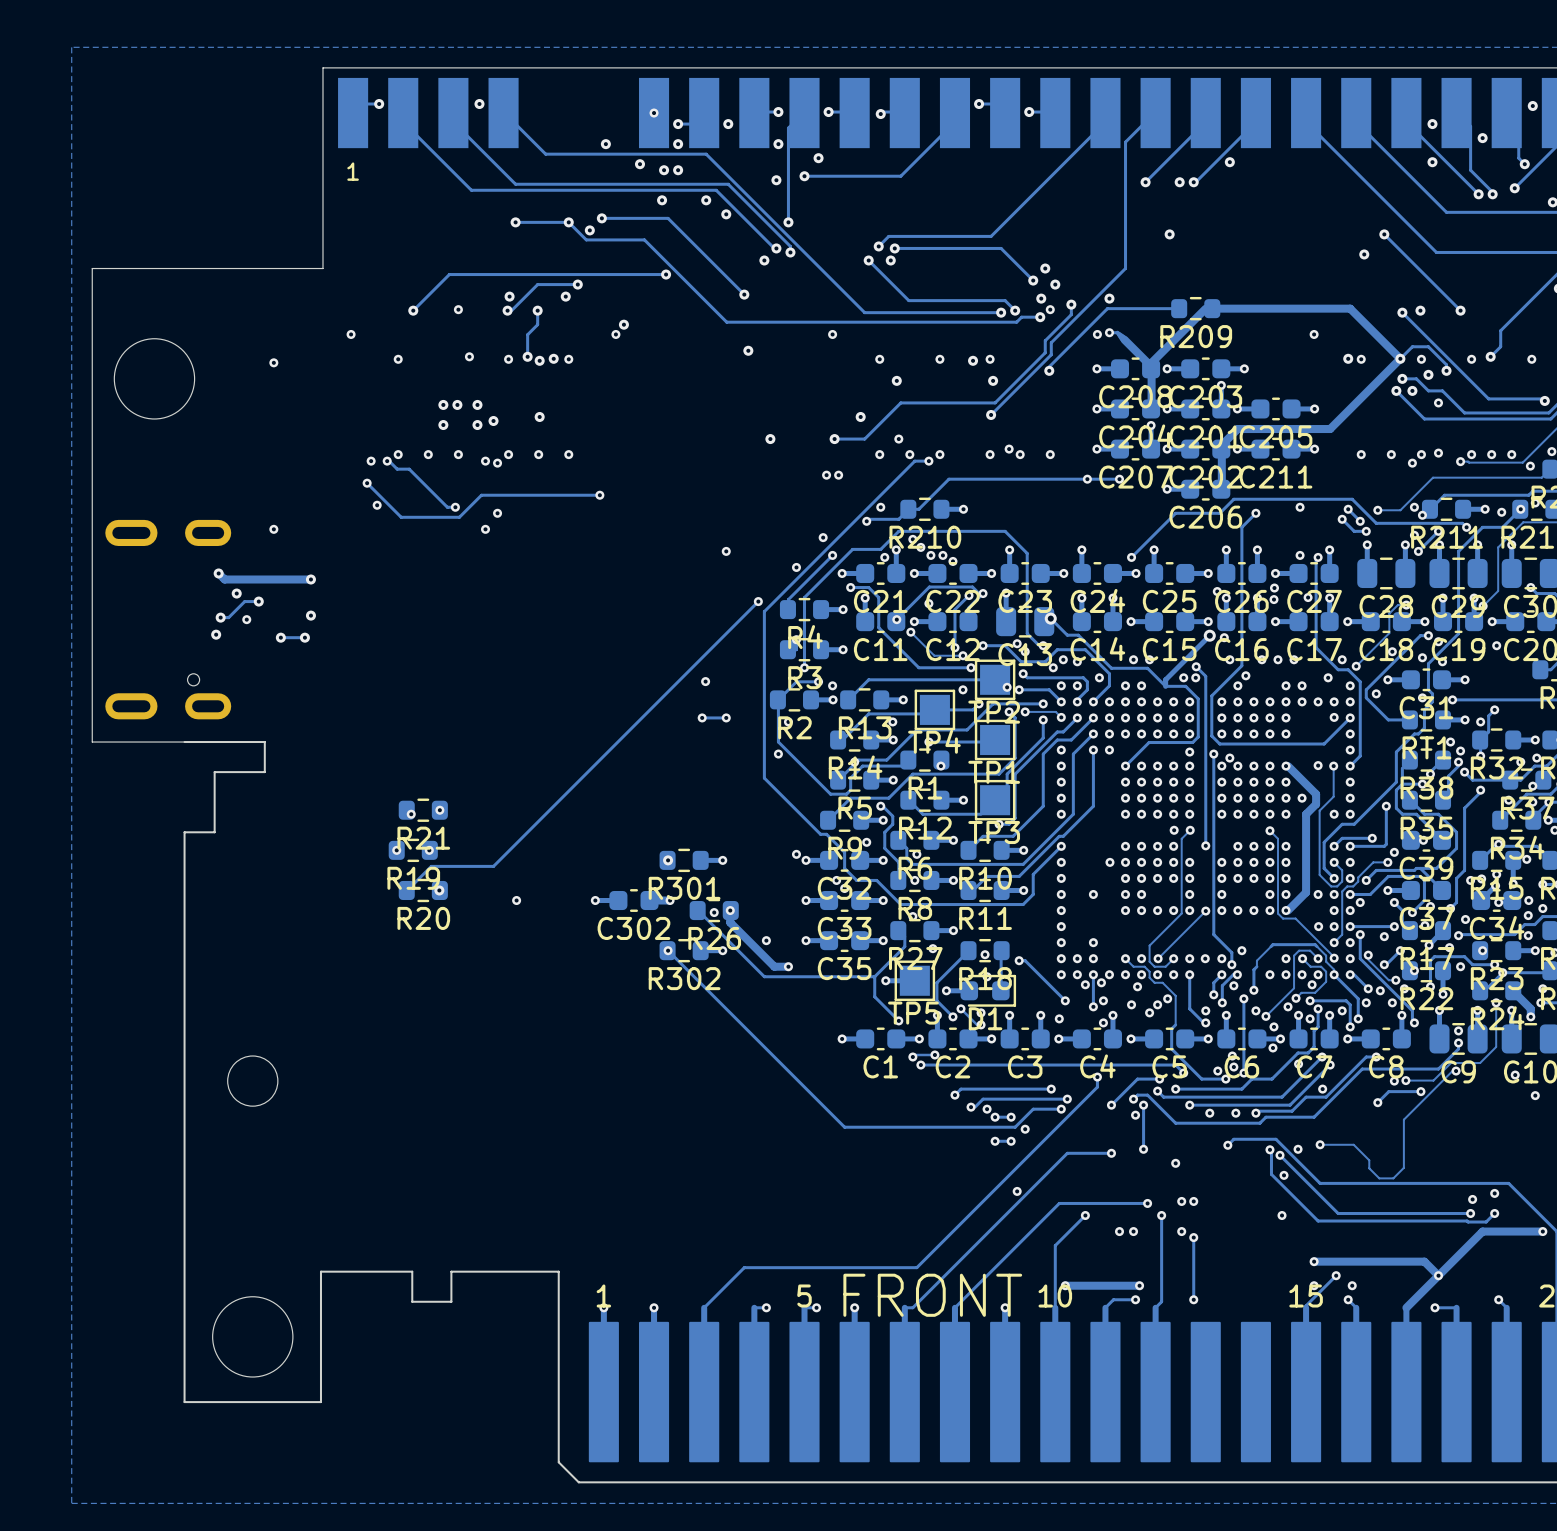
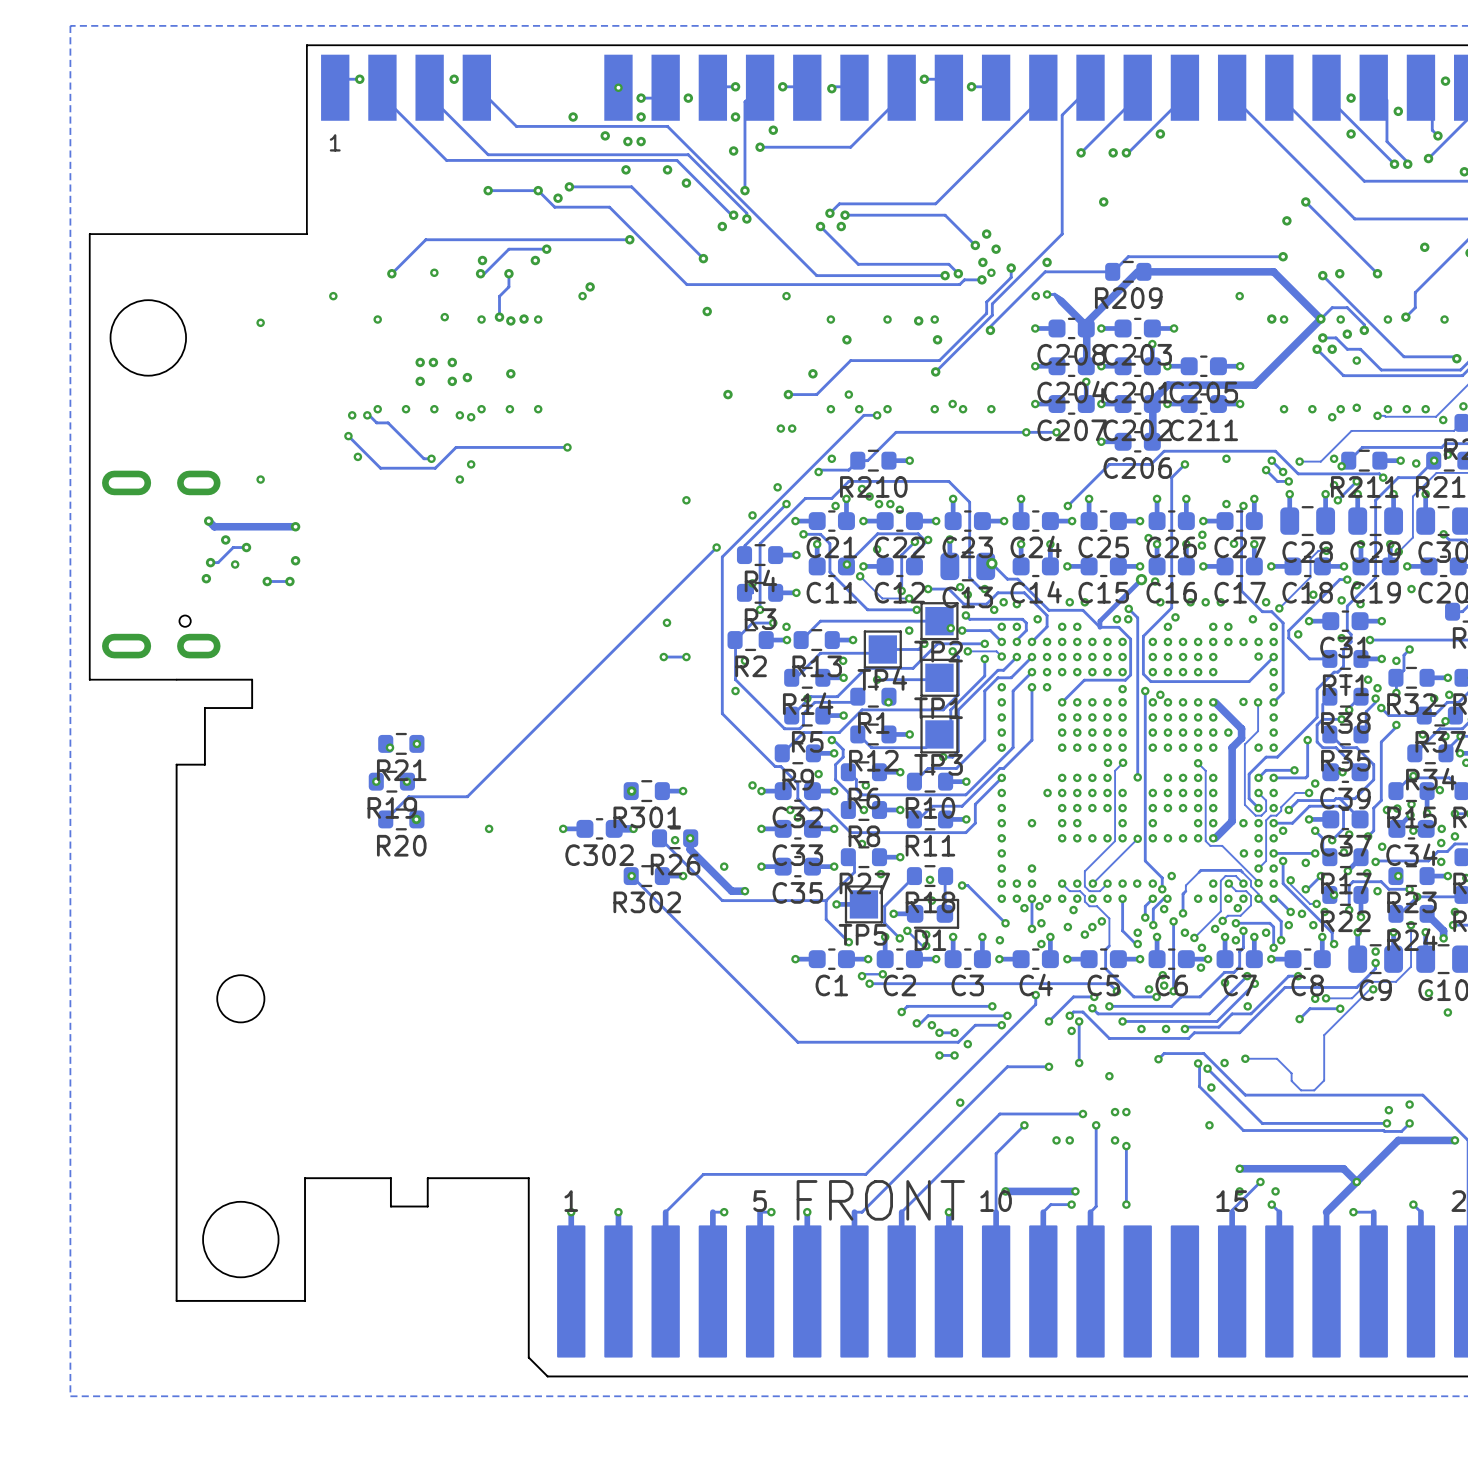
via: none -> (1424, 247)
track: none -> (1283, 256) (1128, 256) (1113, 271)
via: none -> (1283, 256)

